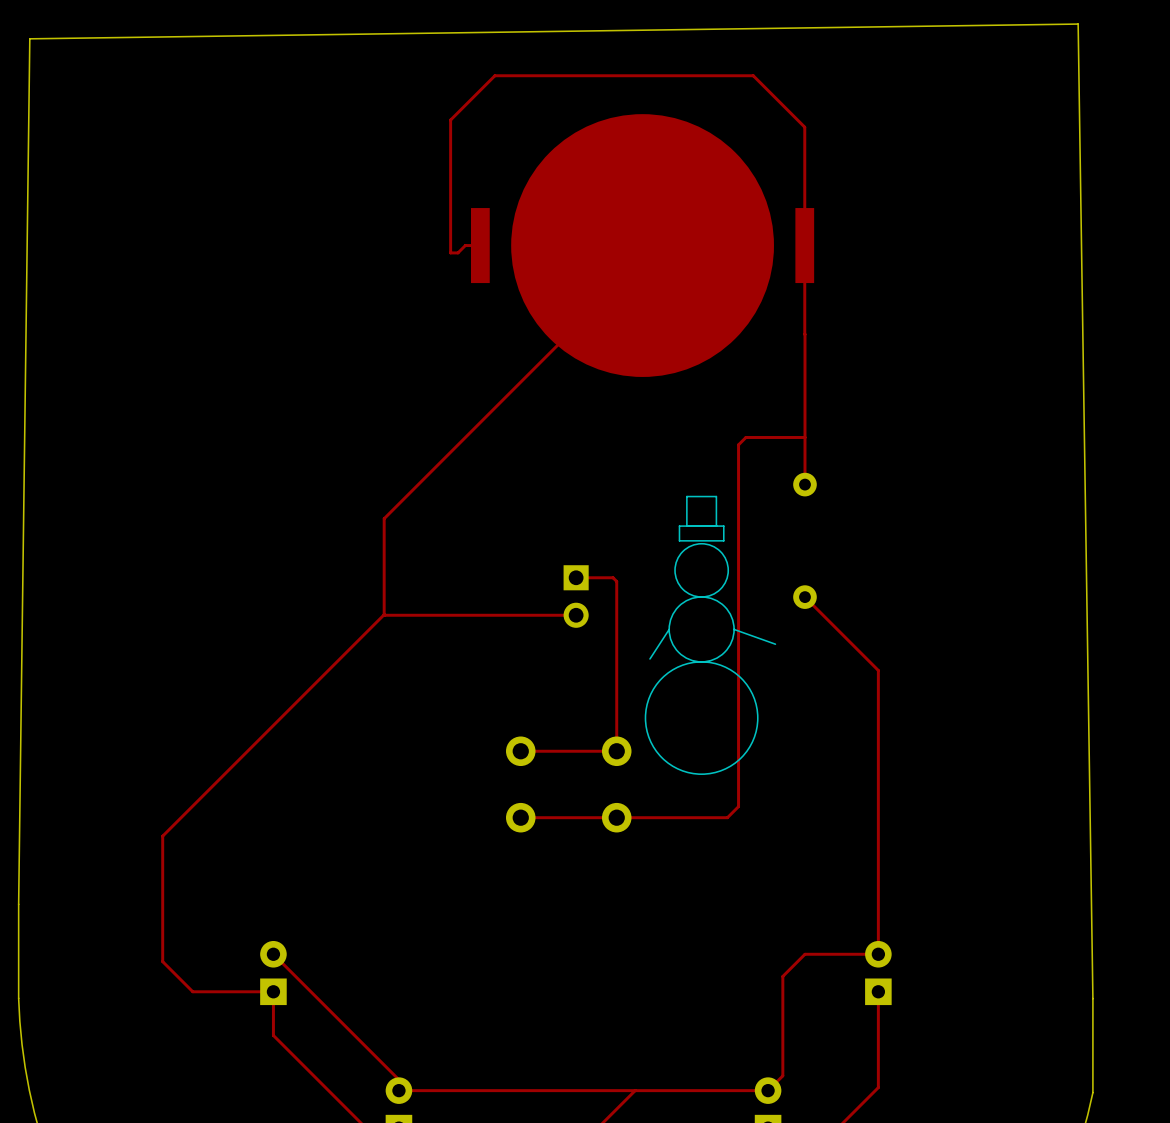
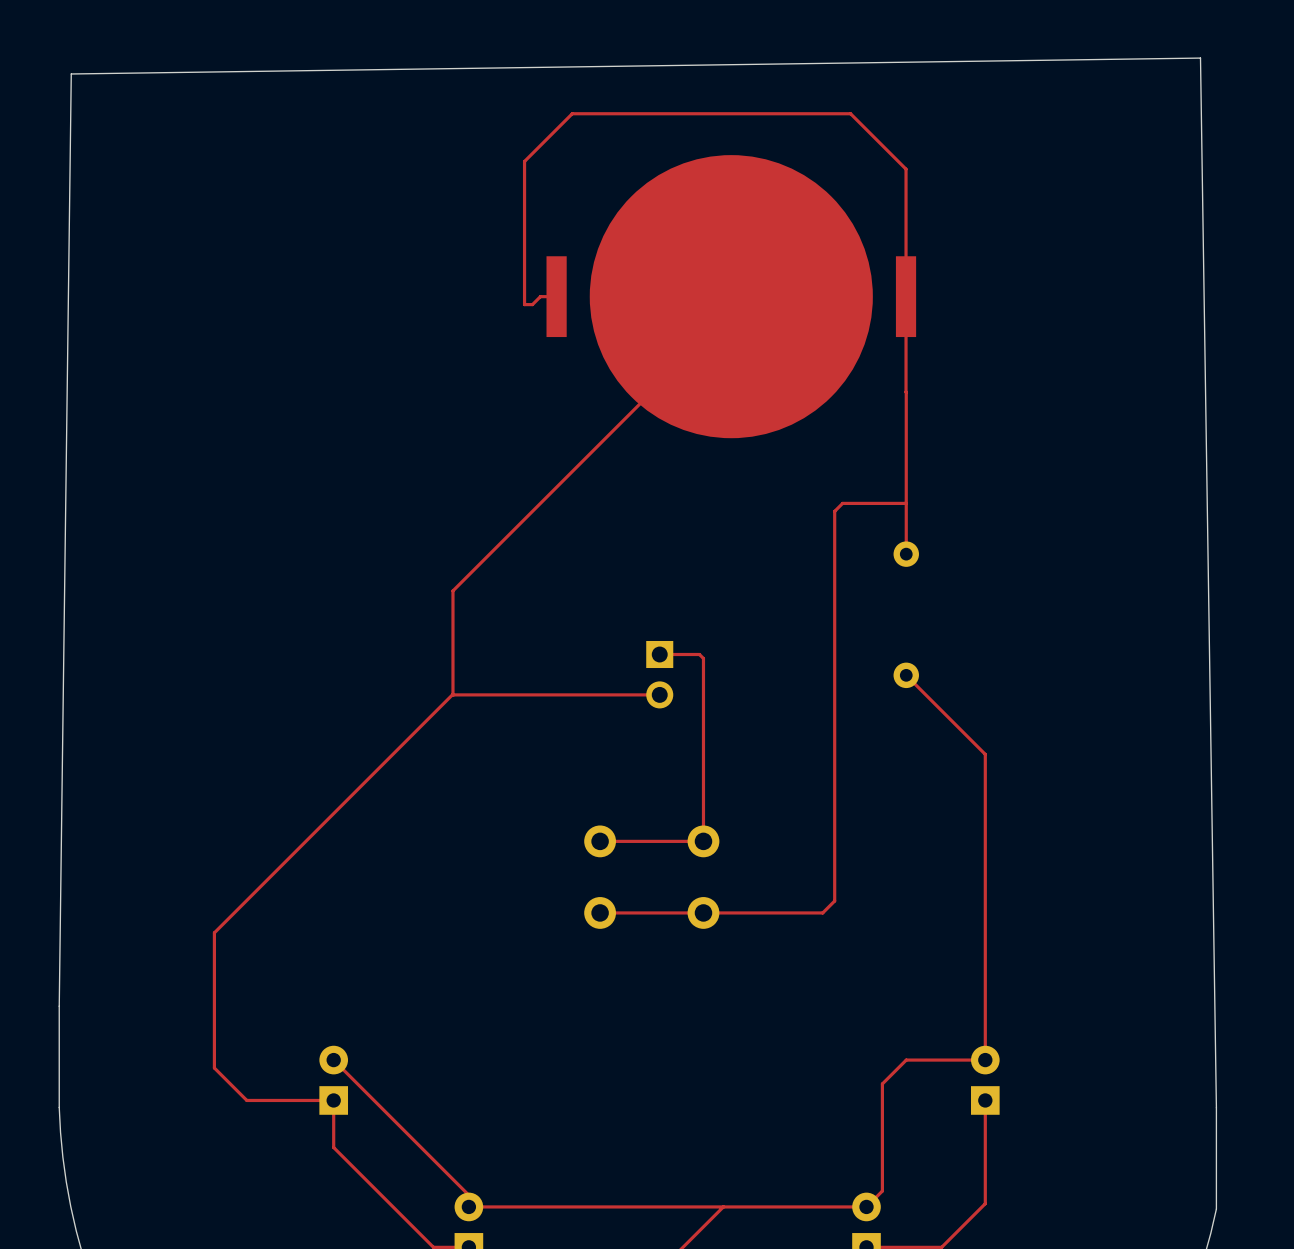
line: (716, 526) (716, 496) (686, 496) (686, 526) -> none
line: (723, 526) (679, 526) (679, 540) (723, 540) (723, 526) -> none
drawing: [644, 543, 759, 775] -> none
line: (669, 629) (649, 658) -> none
line: (734, 629) (775, 644) -> none

